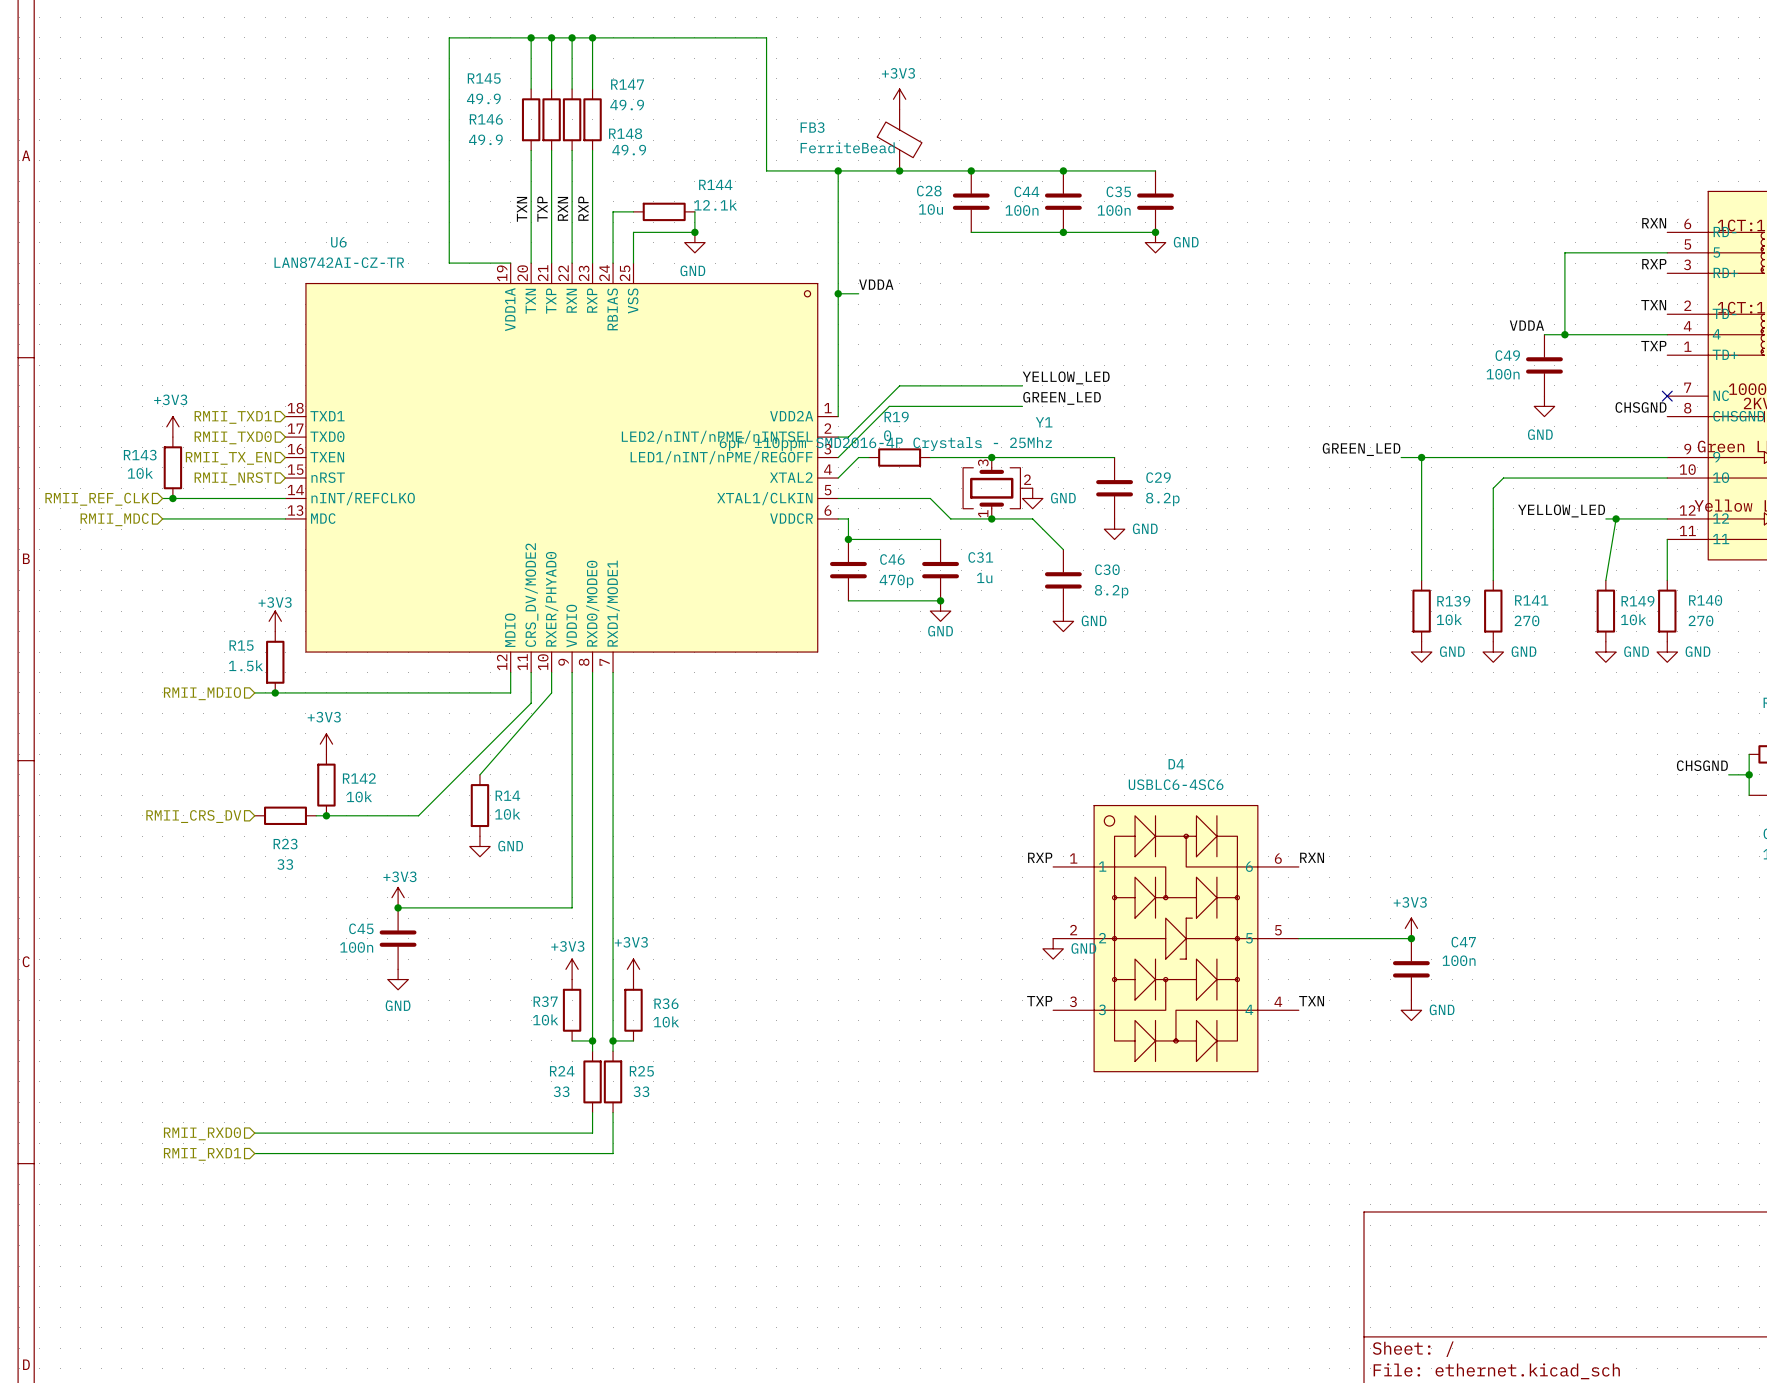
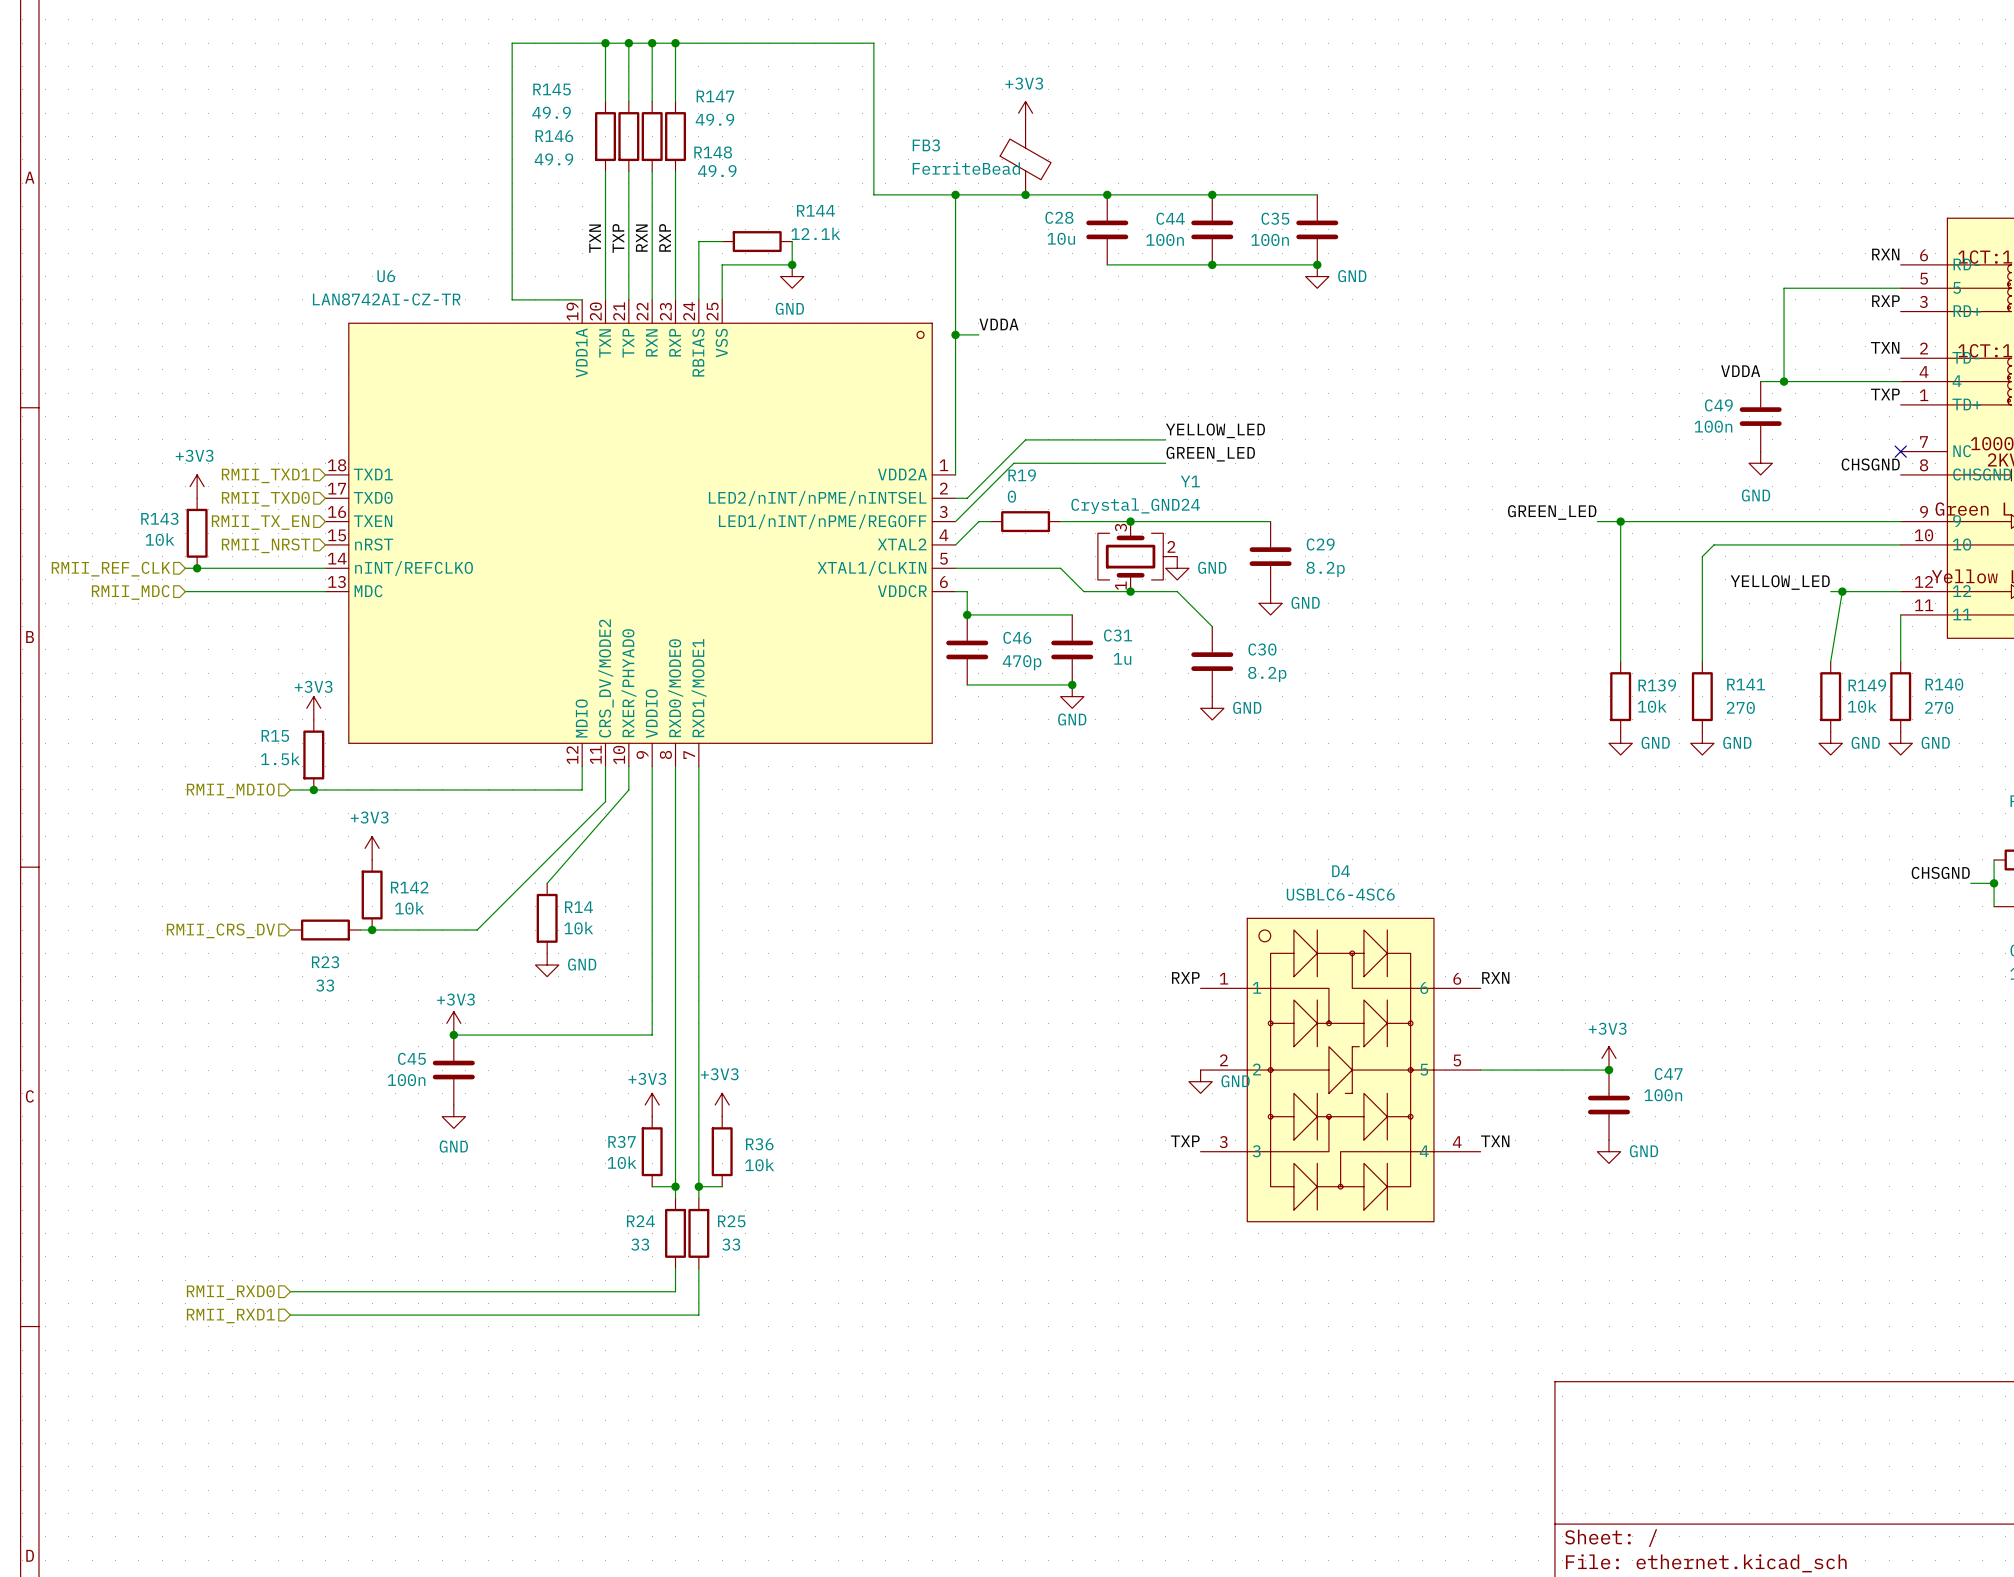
Y1 value: 6pF ±10ppm SMD2016-4P Crystals - 25Mhz (885, 443) -> Crystal_GND24 (1135, 506)

